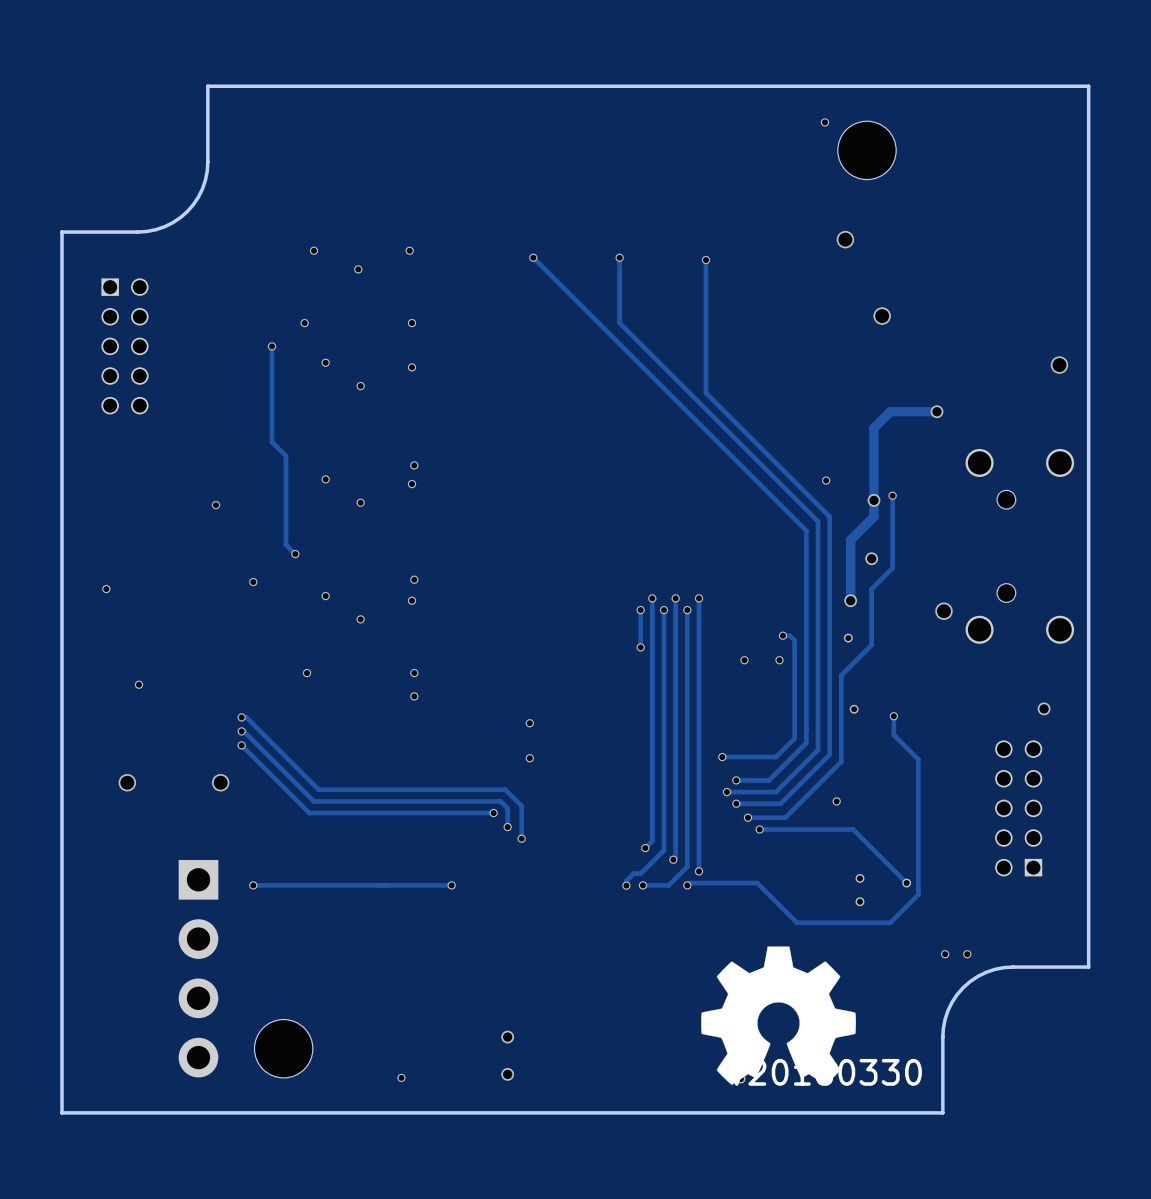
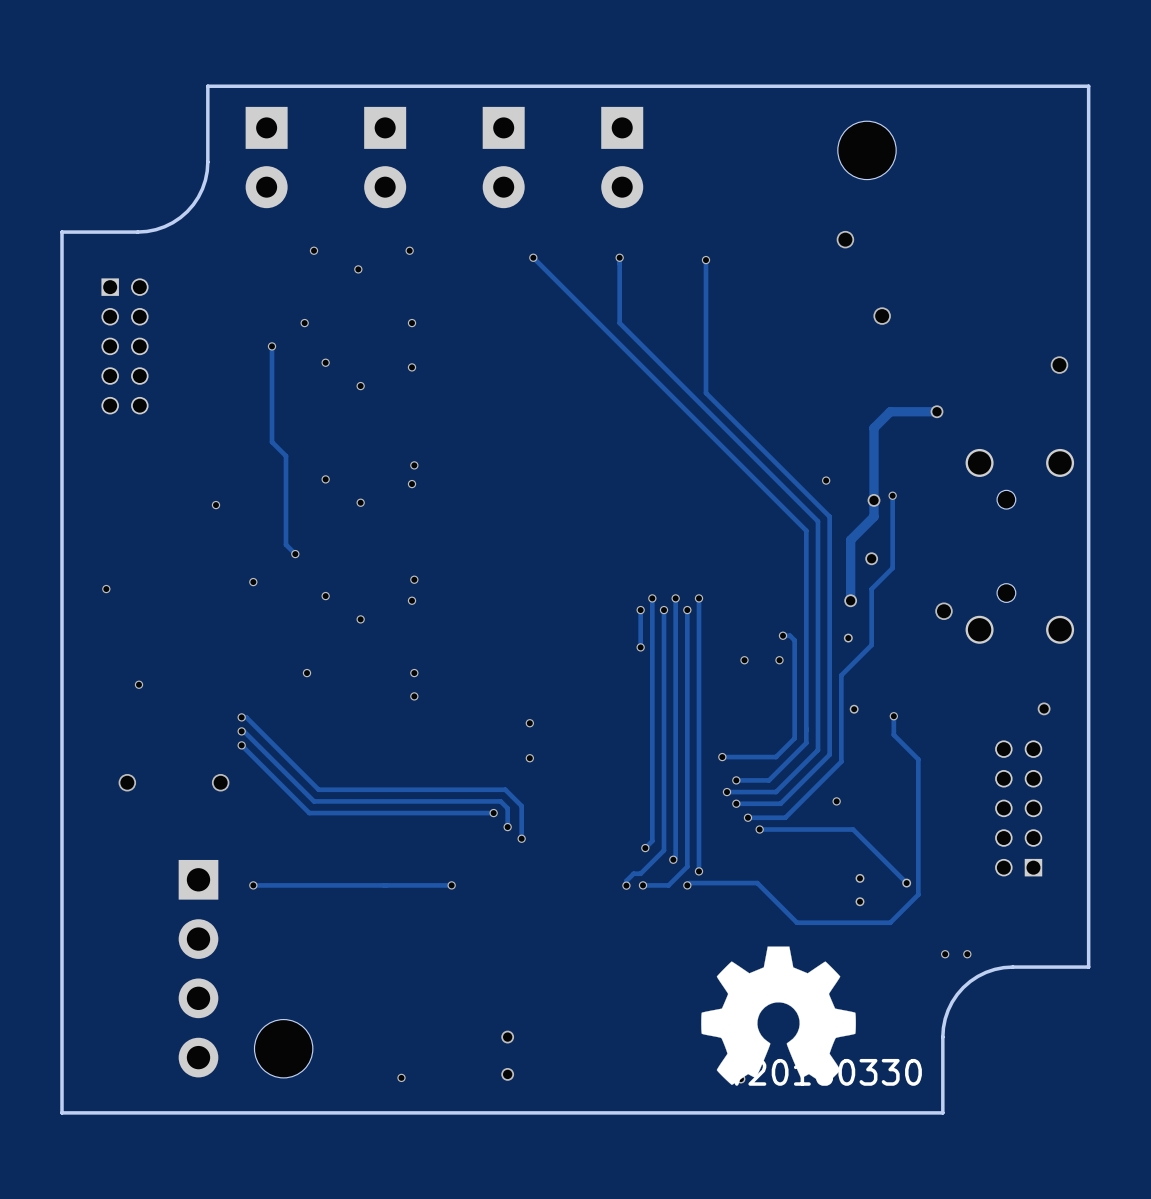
via: (824, 122) -> none
part: none -> (266, 157)
part: none -> (385, 157)
part: none -> (503, 157)
part: none -> (622, 157)

